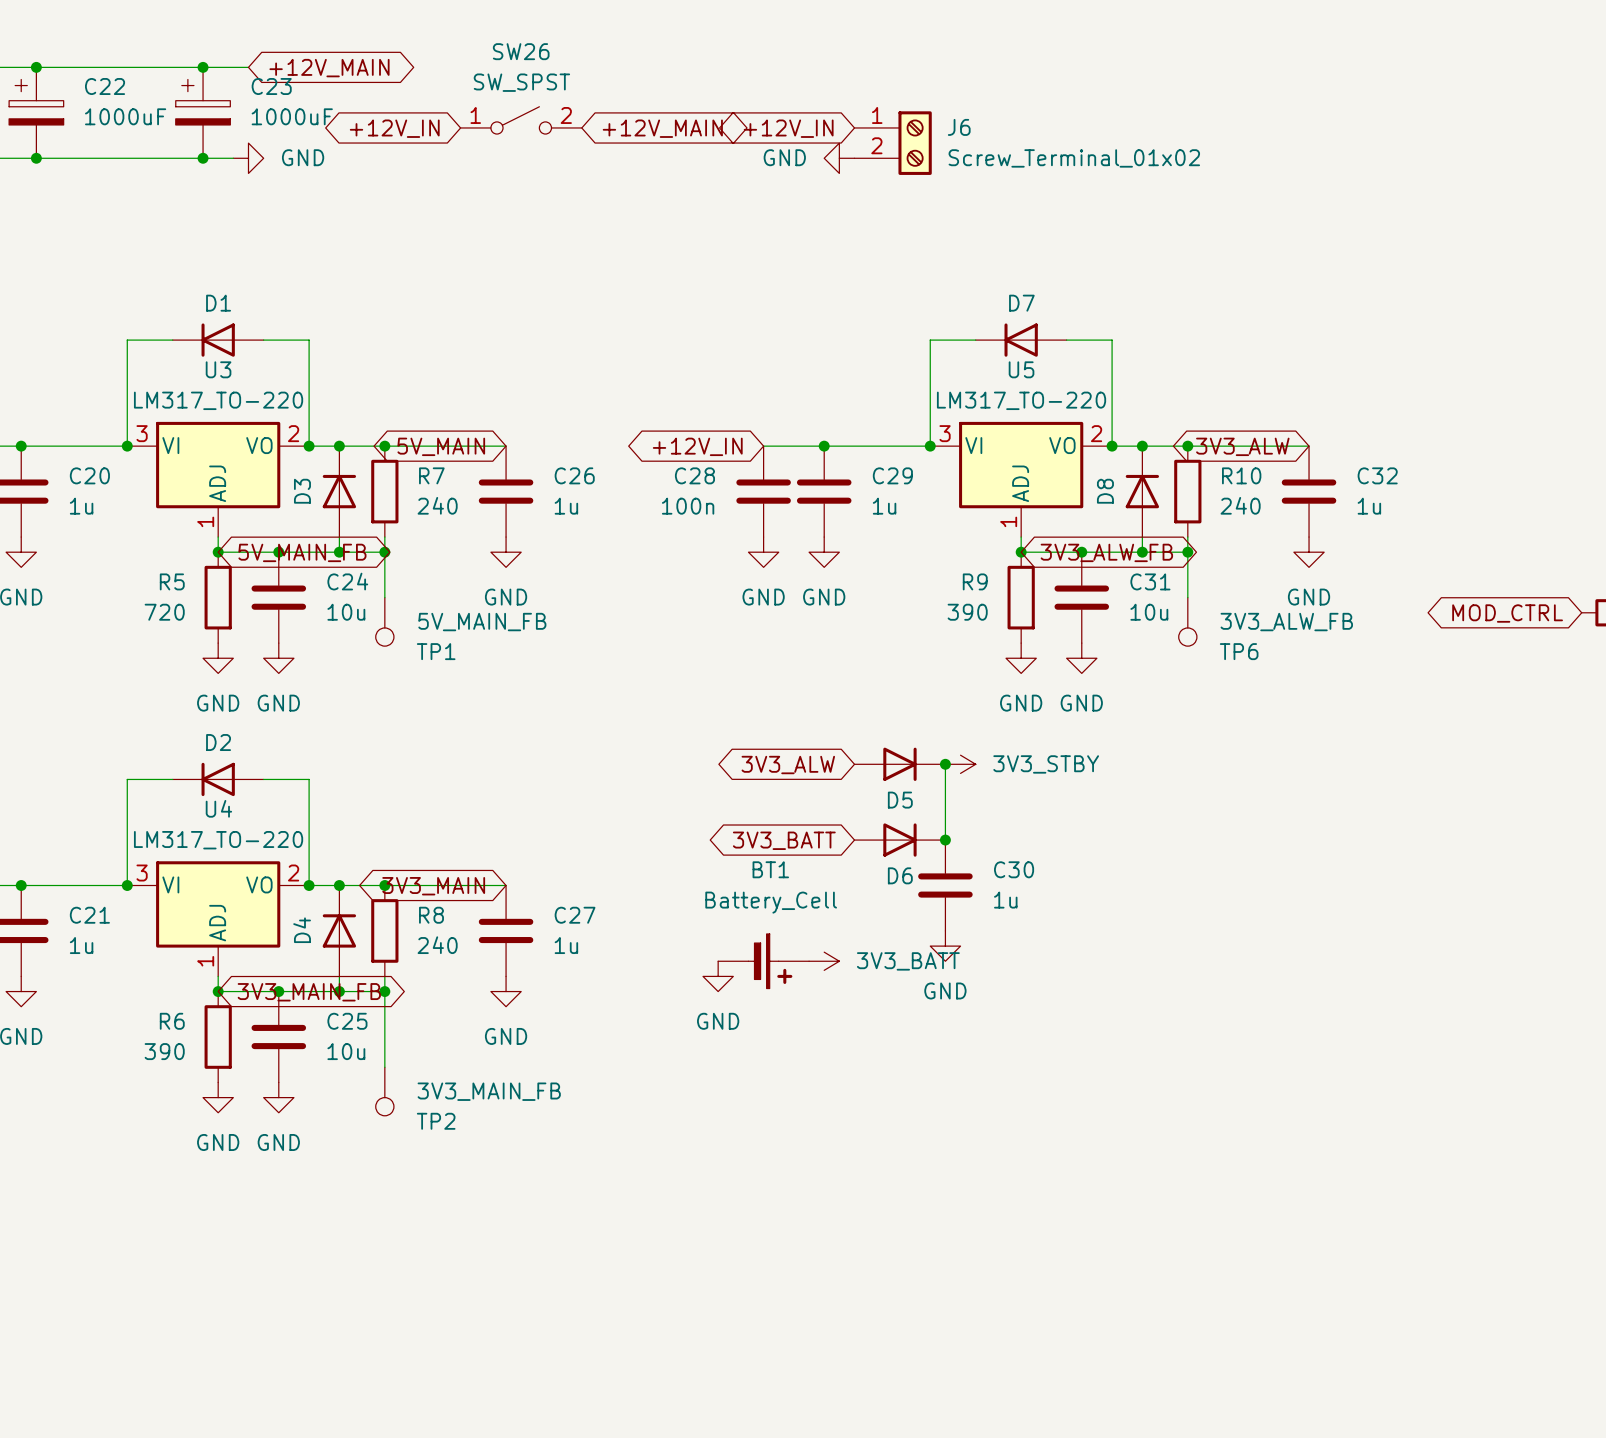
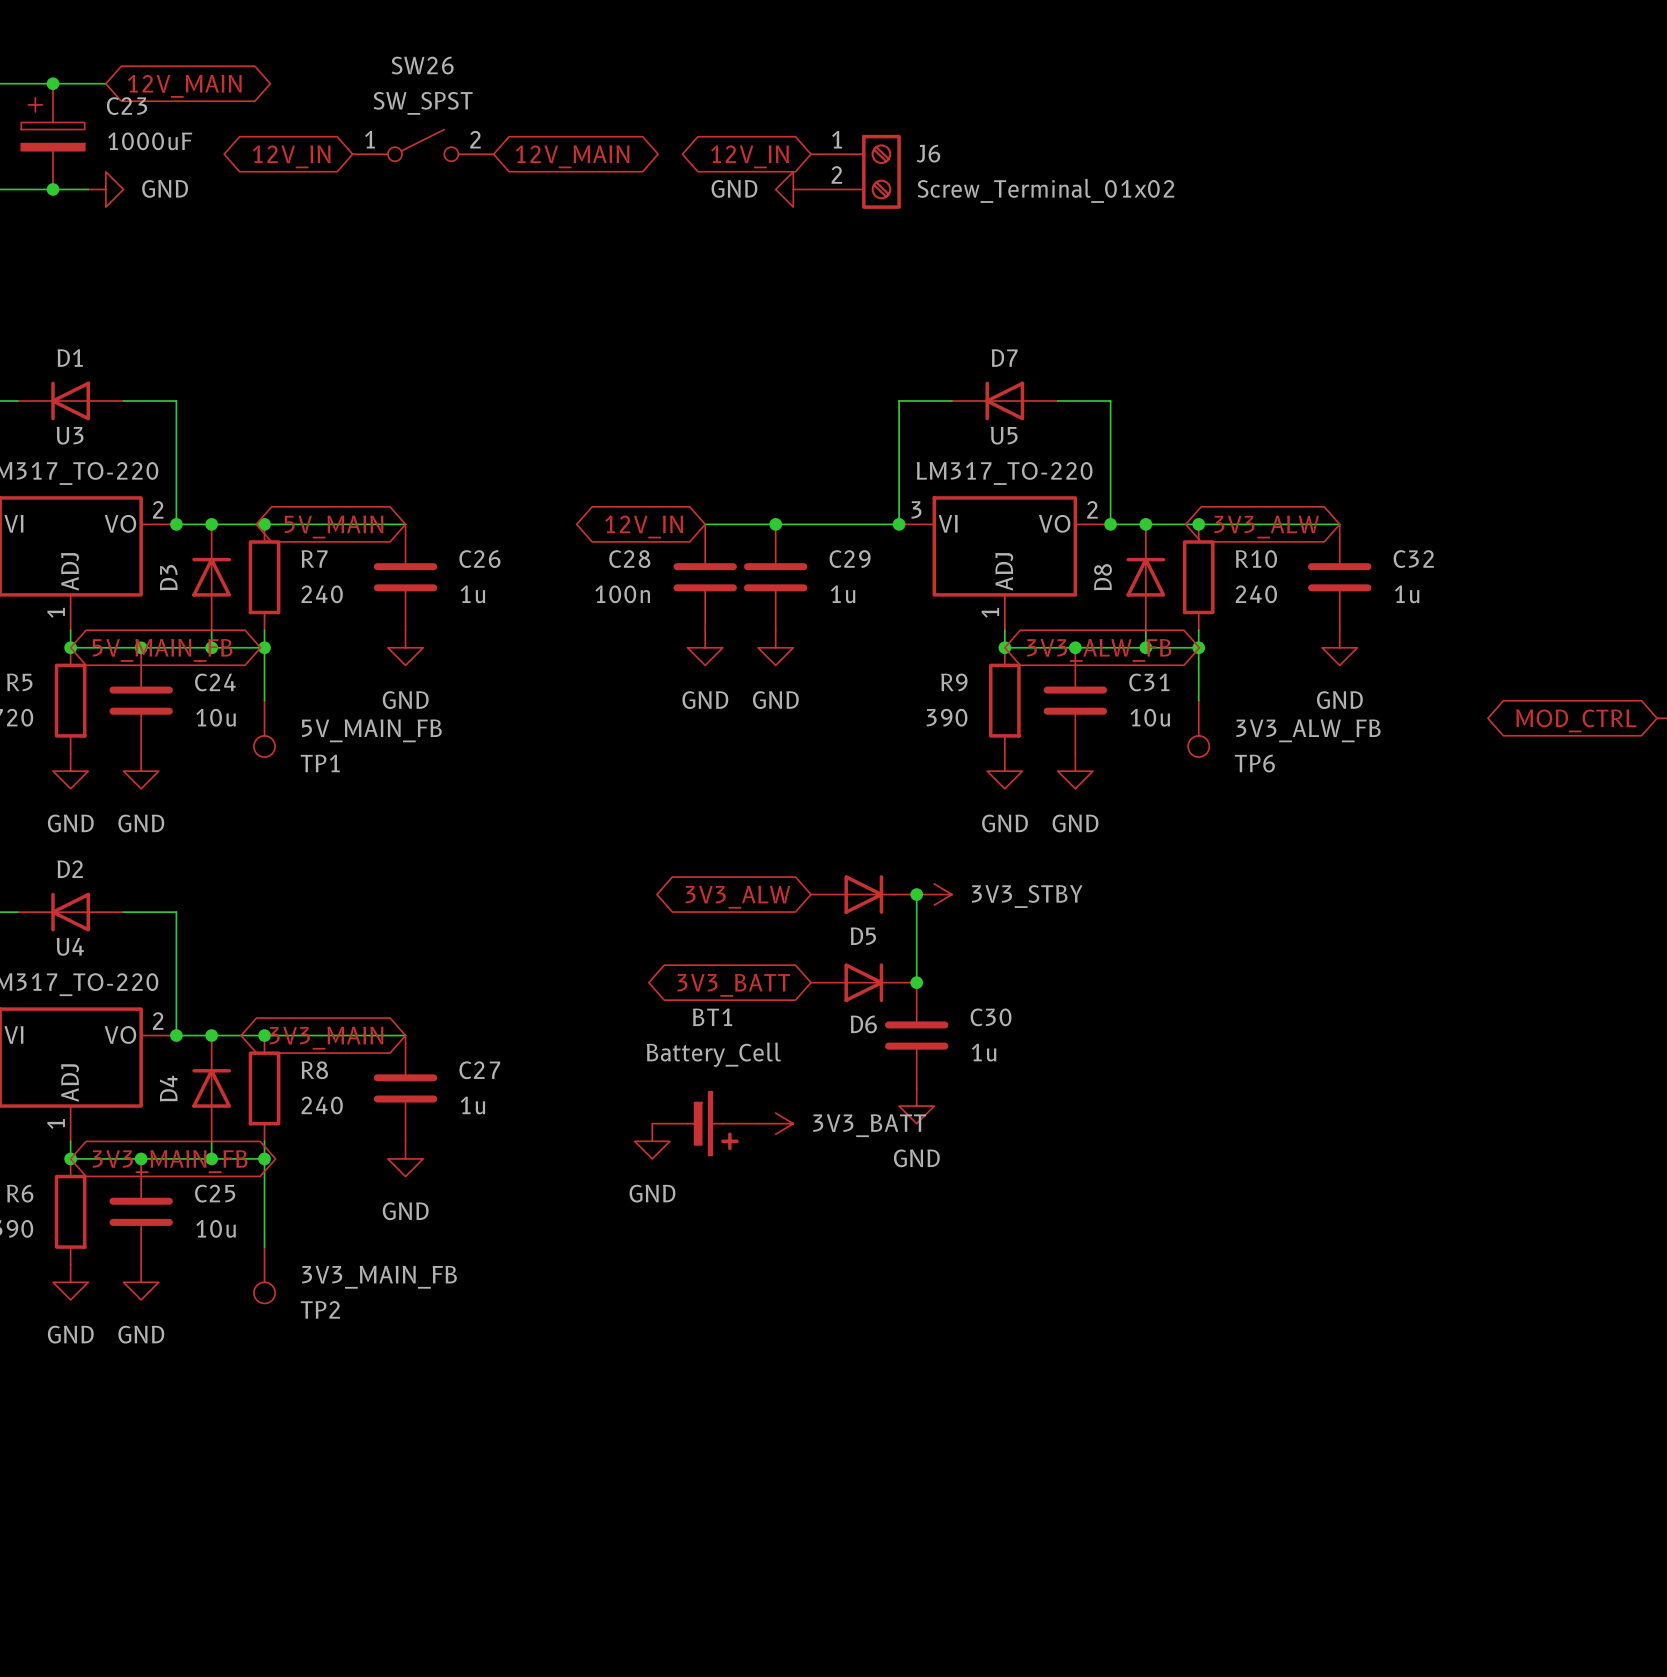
global label: +12V_MAIN (329, 68) -> 12V_MAIN (184, 86)
global label: +12V_IN (394, 128) -> 12V_IN (291, 156)
global label: +12V_MAIN (662, 128) -> 12V_MAIN (572, 156)
global label: +12V_IN (788, 128) -> 12V_IN (749, 156)
global label: +12V_IN (697, 446) -> 12V_IN (644, 527)

